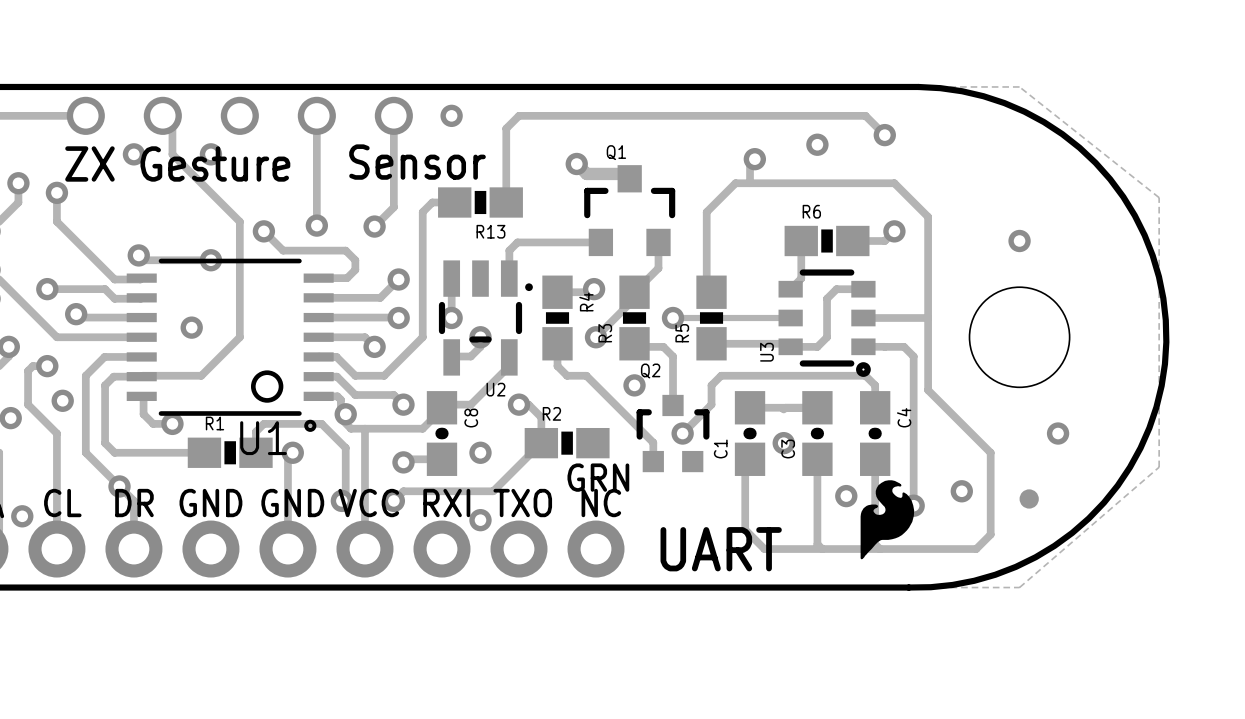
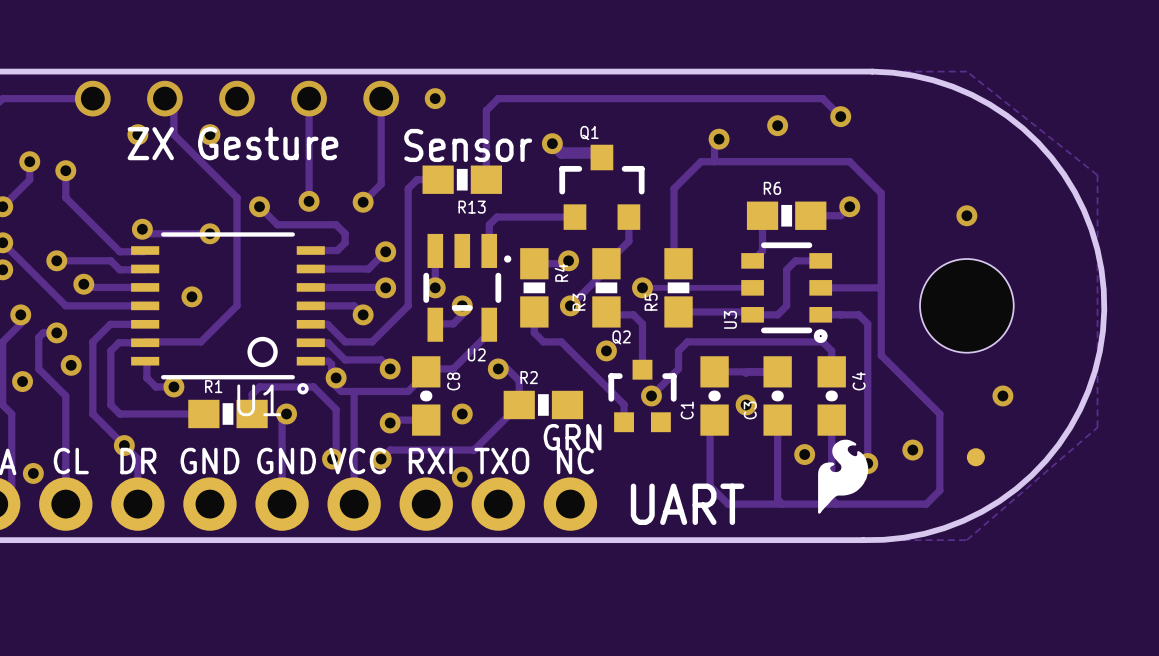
text position: Sensor (417, 162) -> Sensor (468, 145)
text position: ZX Gesture (177, 163) -> ZX Gesture (232, 143)

